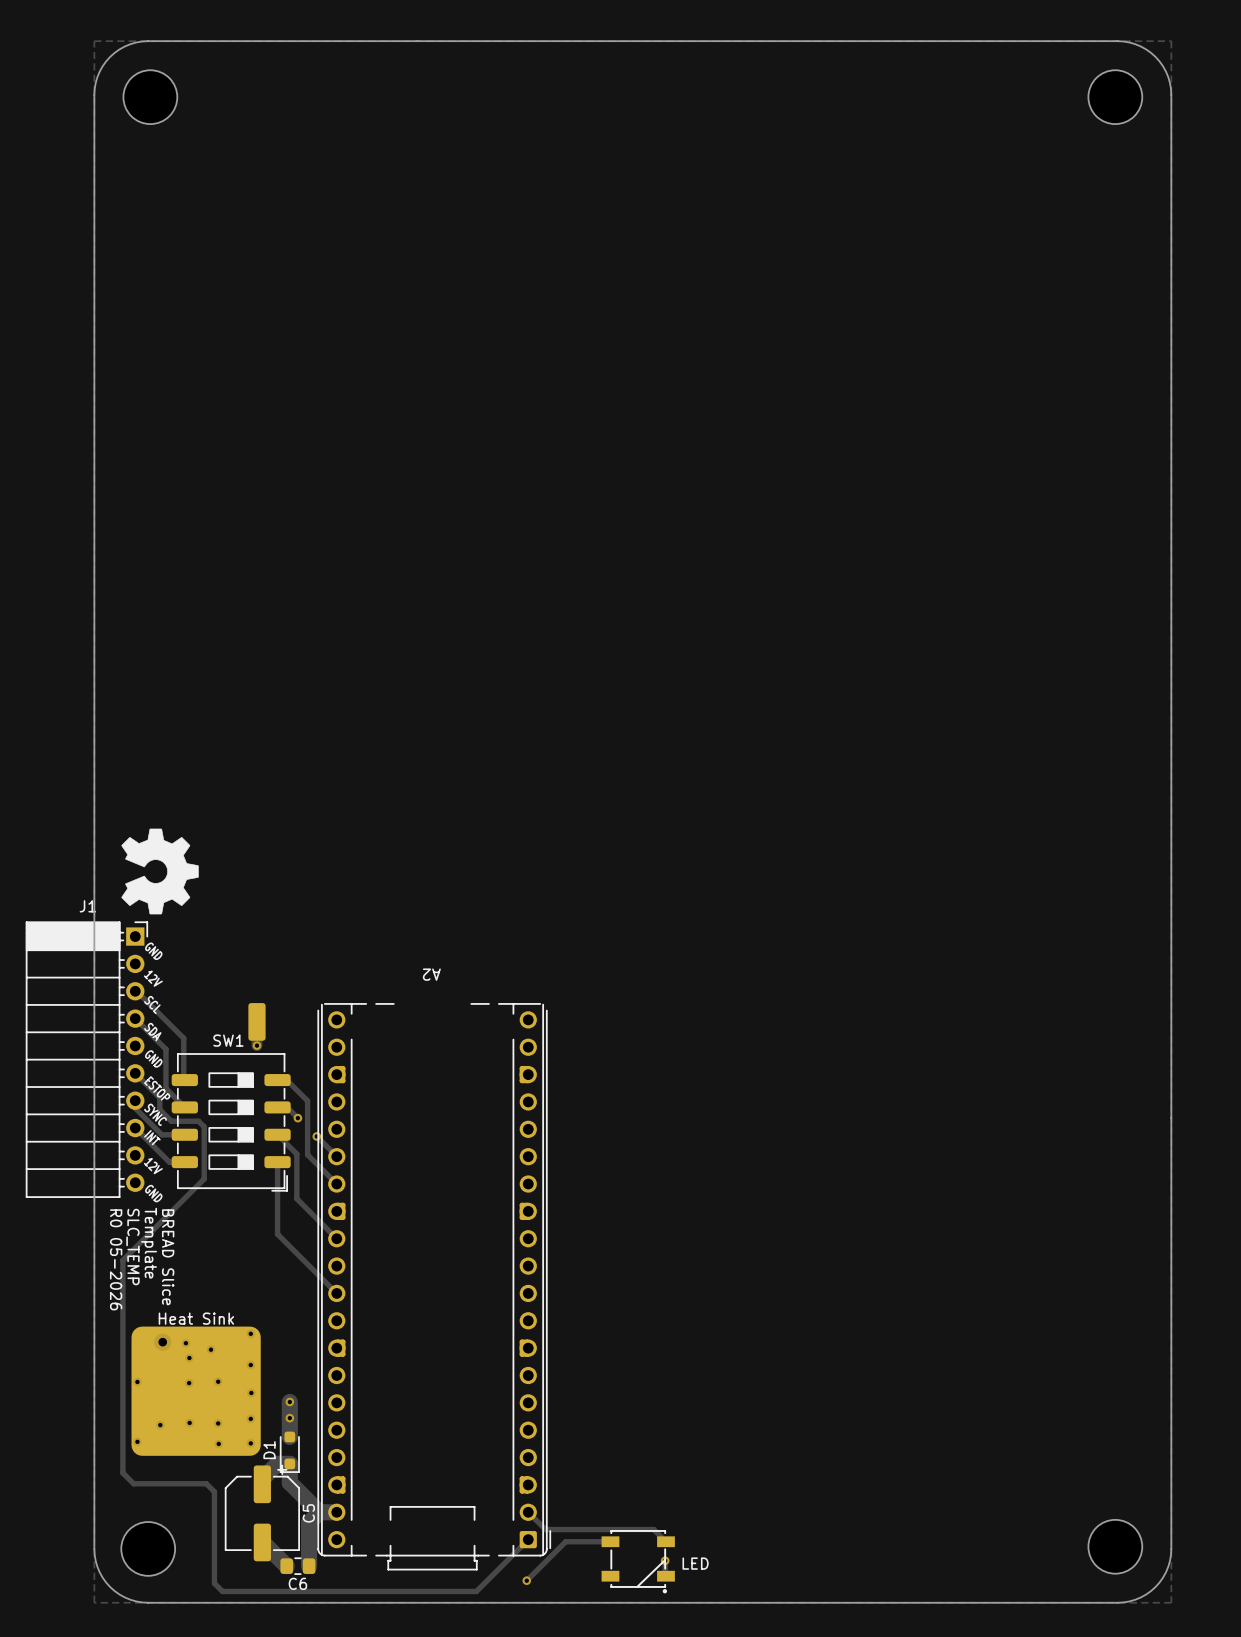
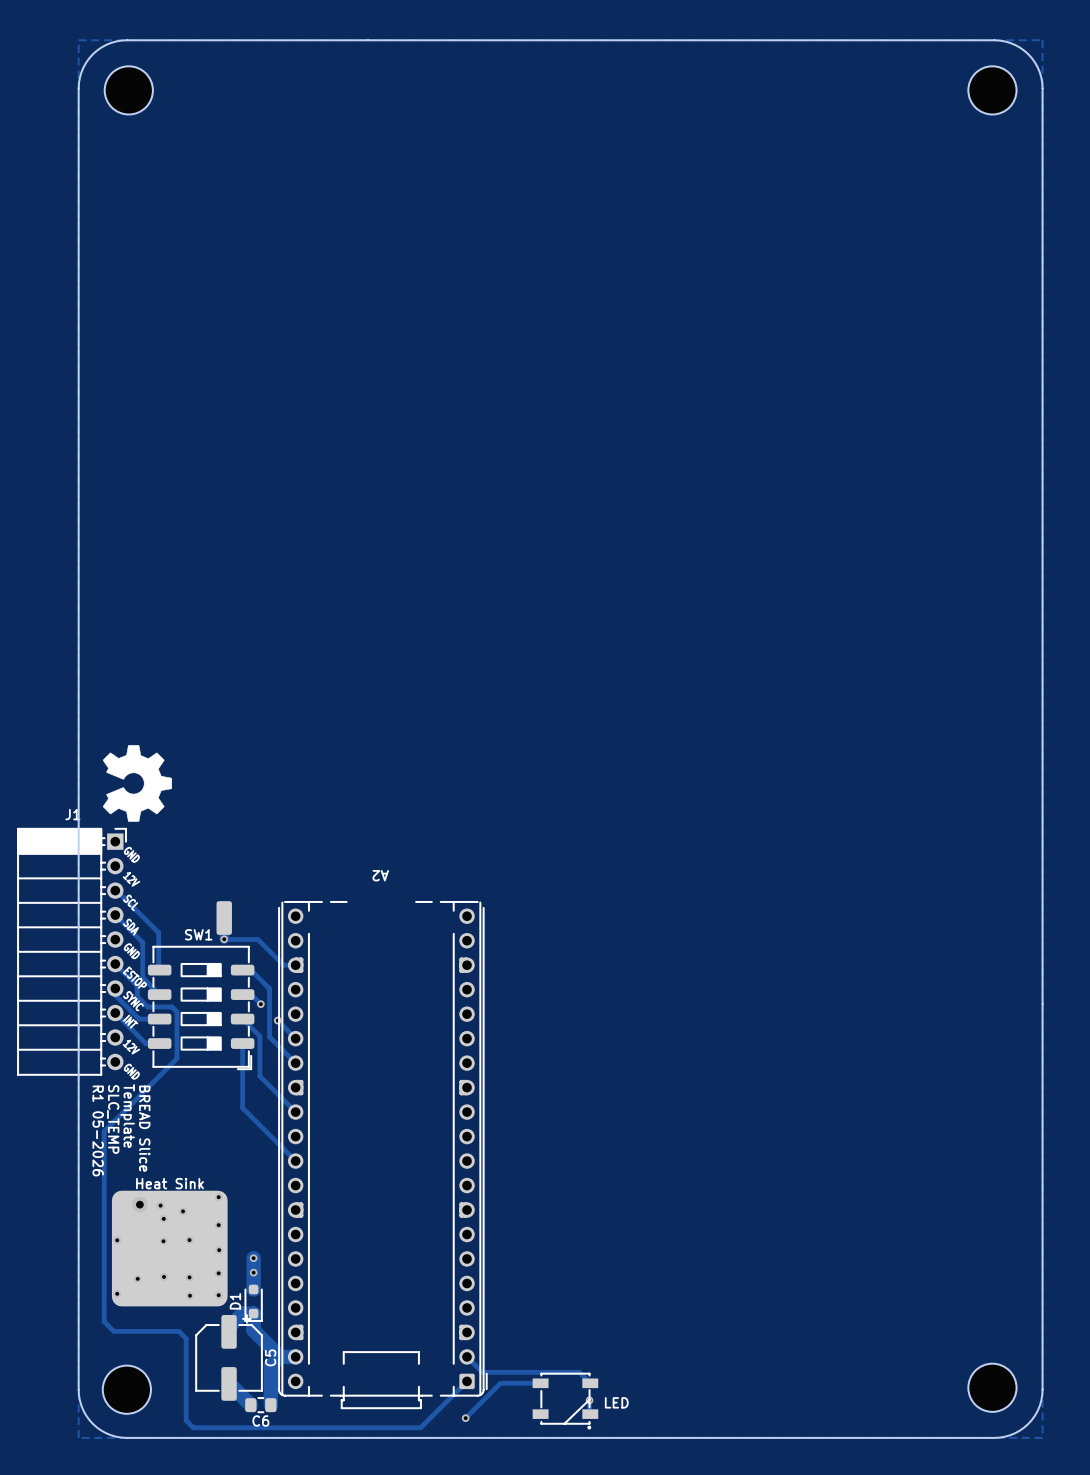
track: none -> (224, 939) (257, 939) (283, 965) (295, 965)
text: R0 05-2026 (116, 1259) -> R1 05-2026 (98, 1130)

